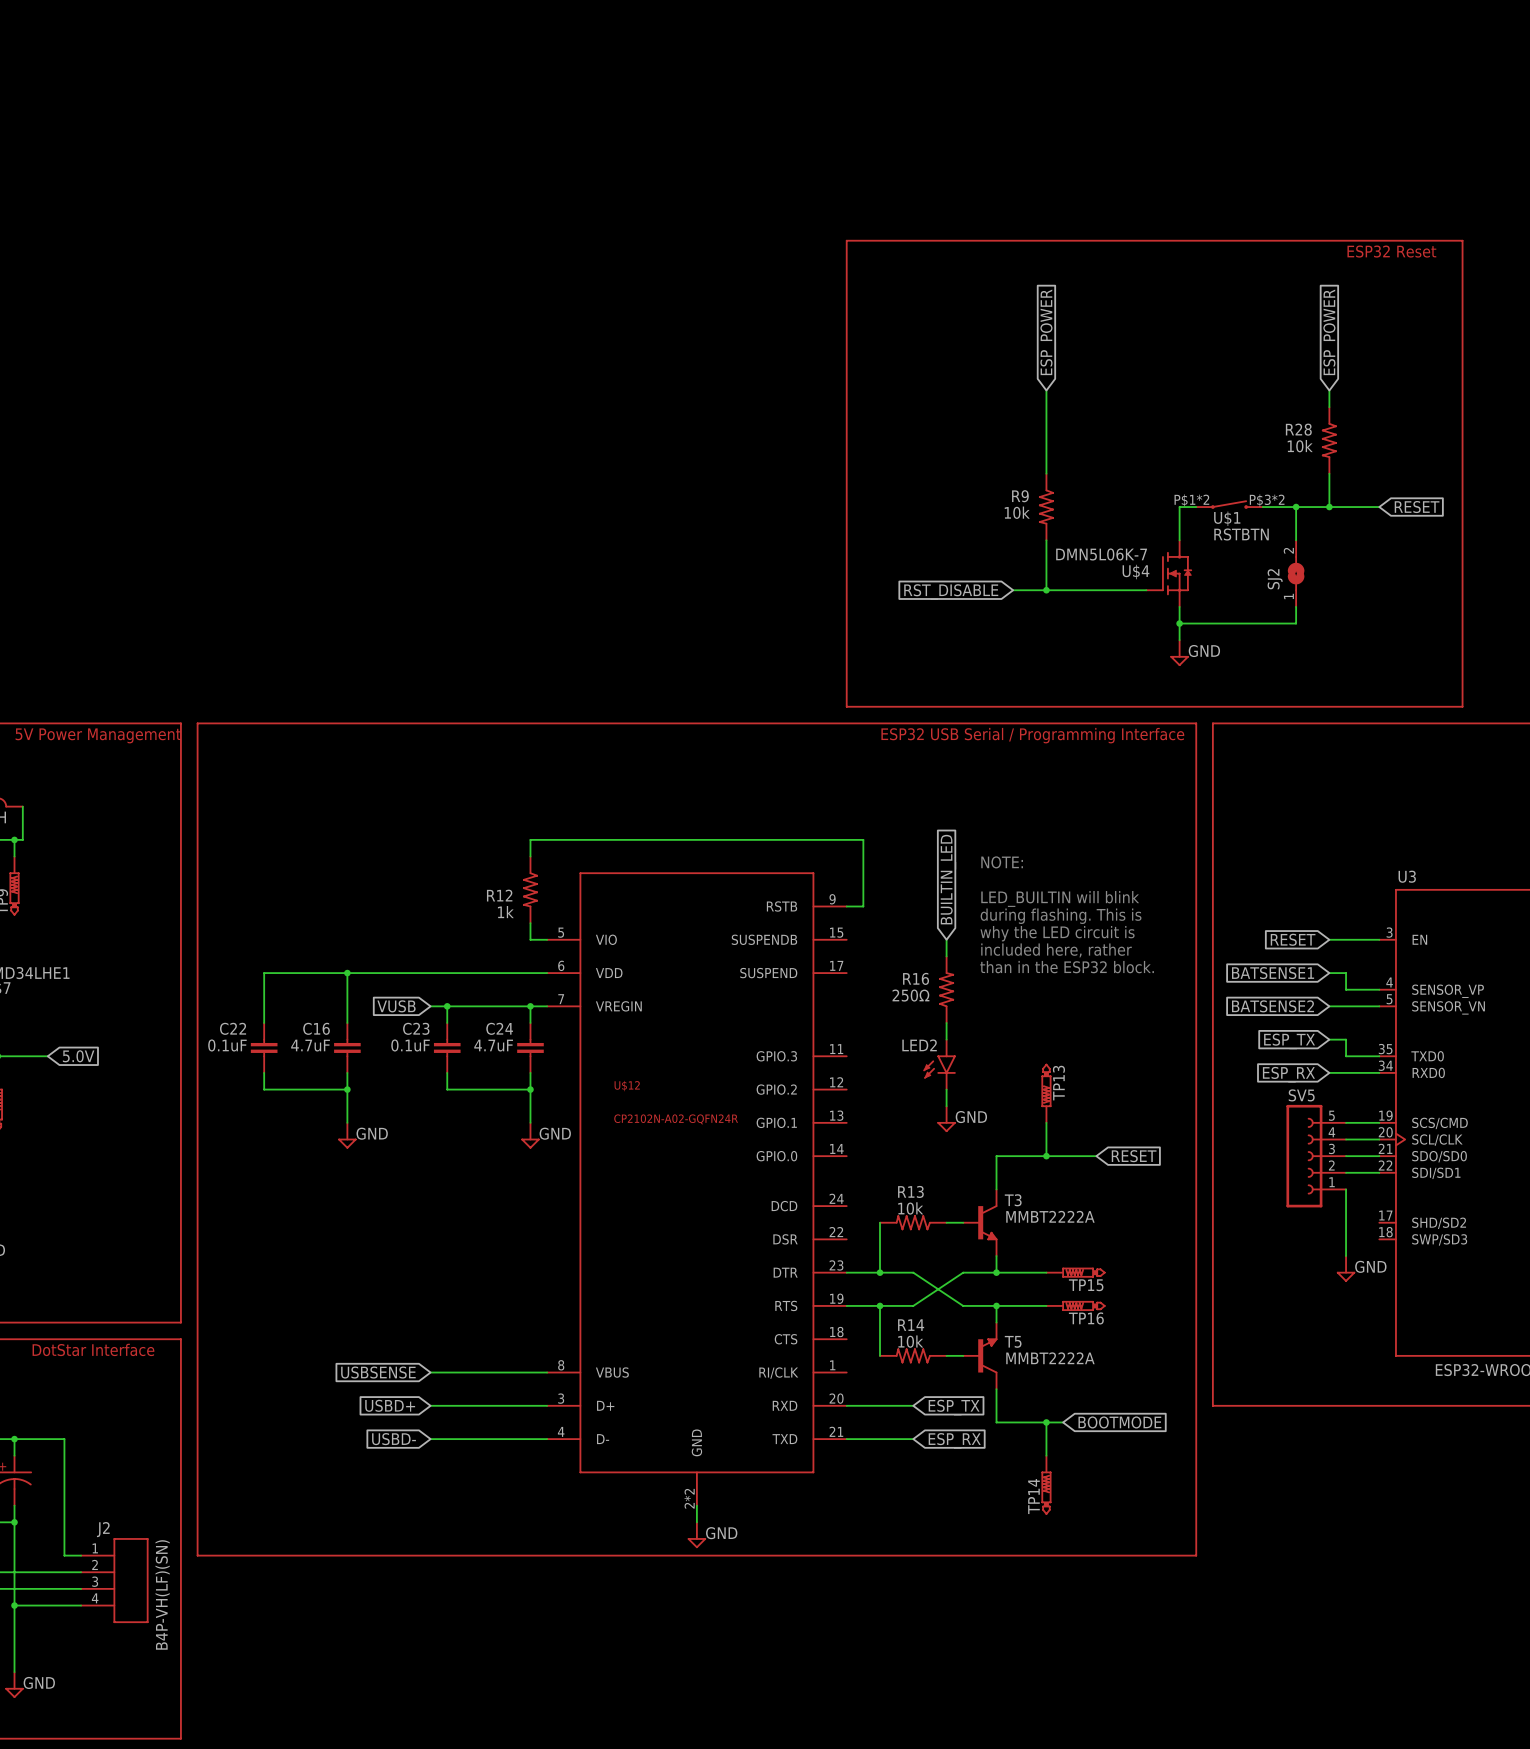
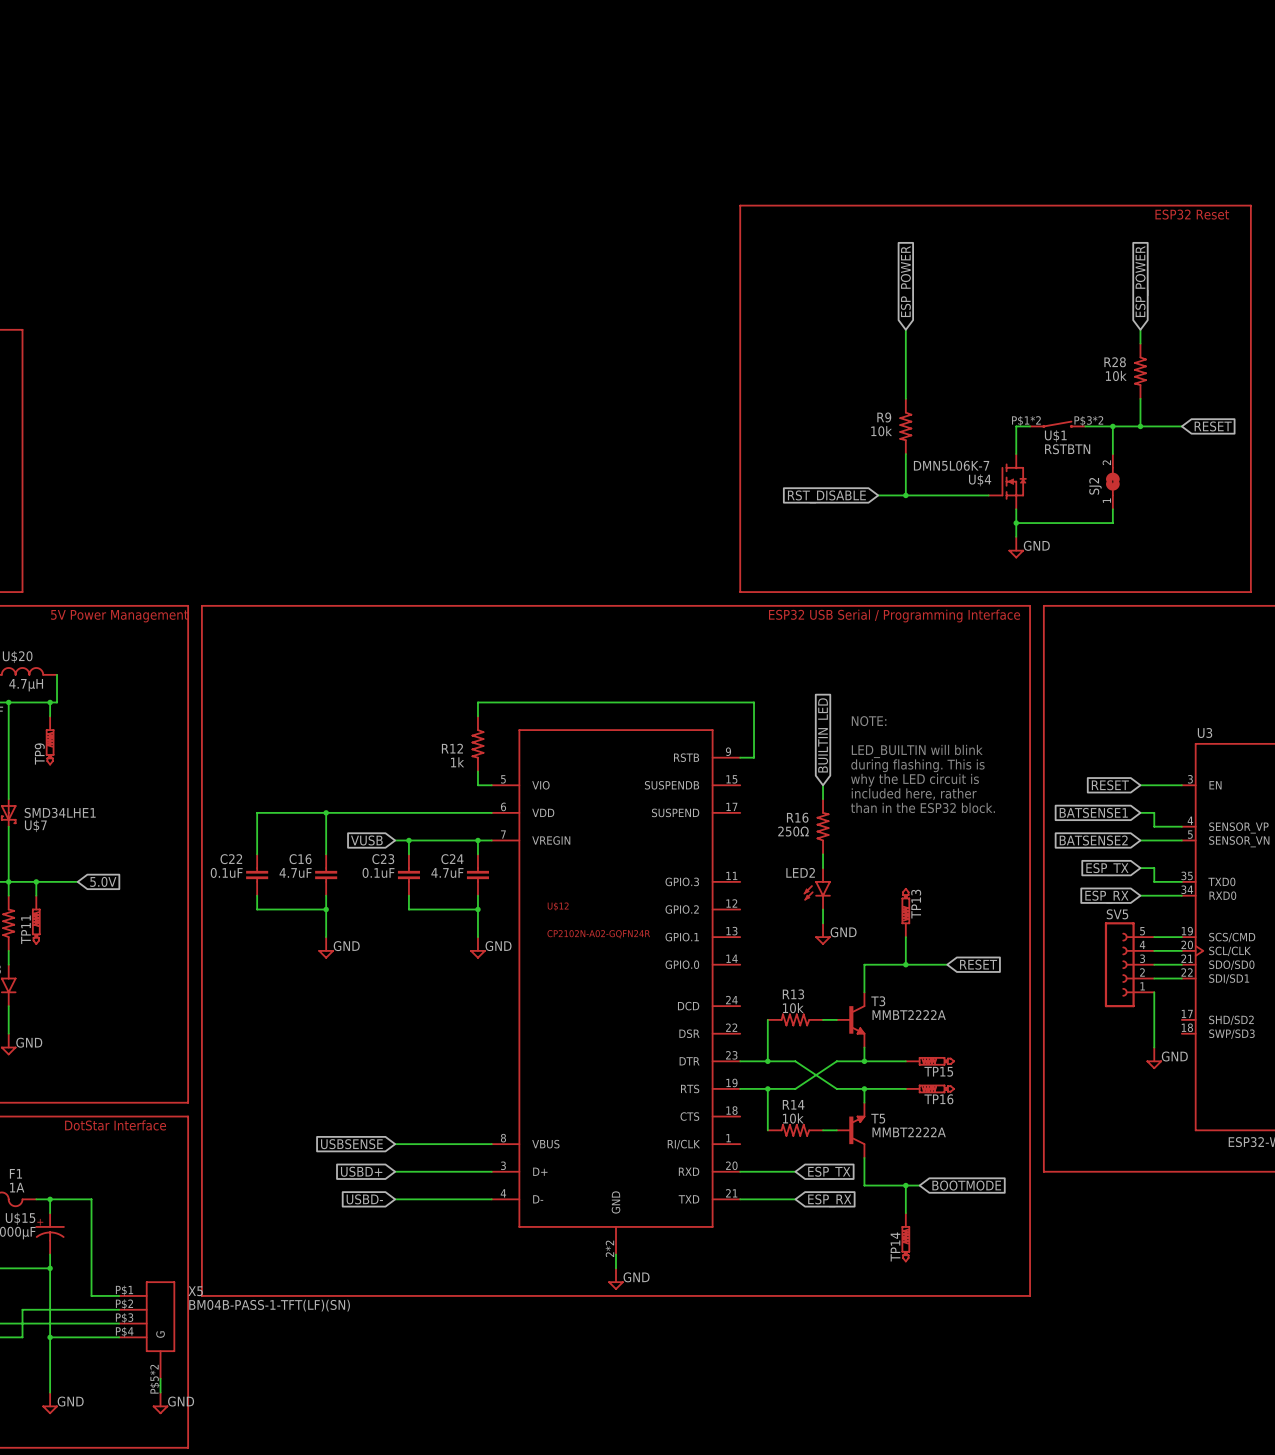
J2: B4P-VH(LF)(SN) (114, 1580) -> none
X5: none -> BM04B-PASS-1-TFT(LF)(SN) (147, 1330)
wire: none -> (160, 1378) (160, 1392)
power symbol: none -> GND (160, 1403)

